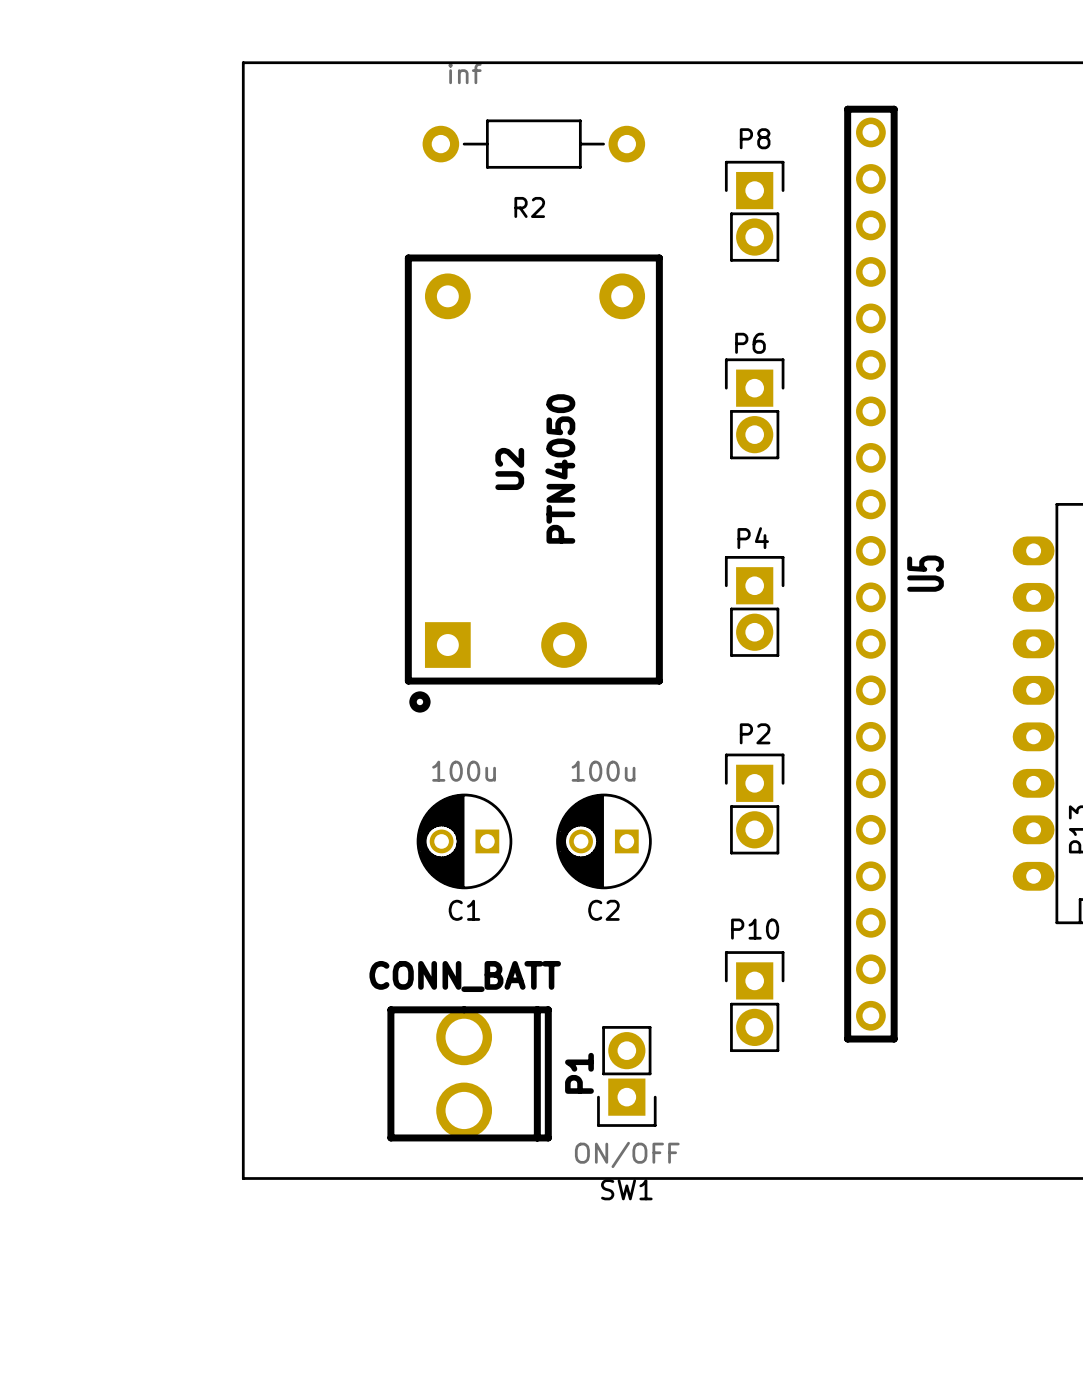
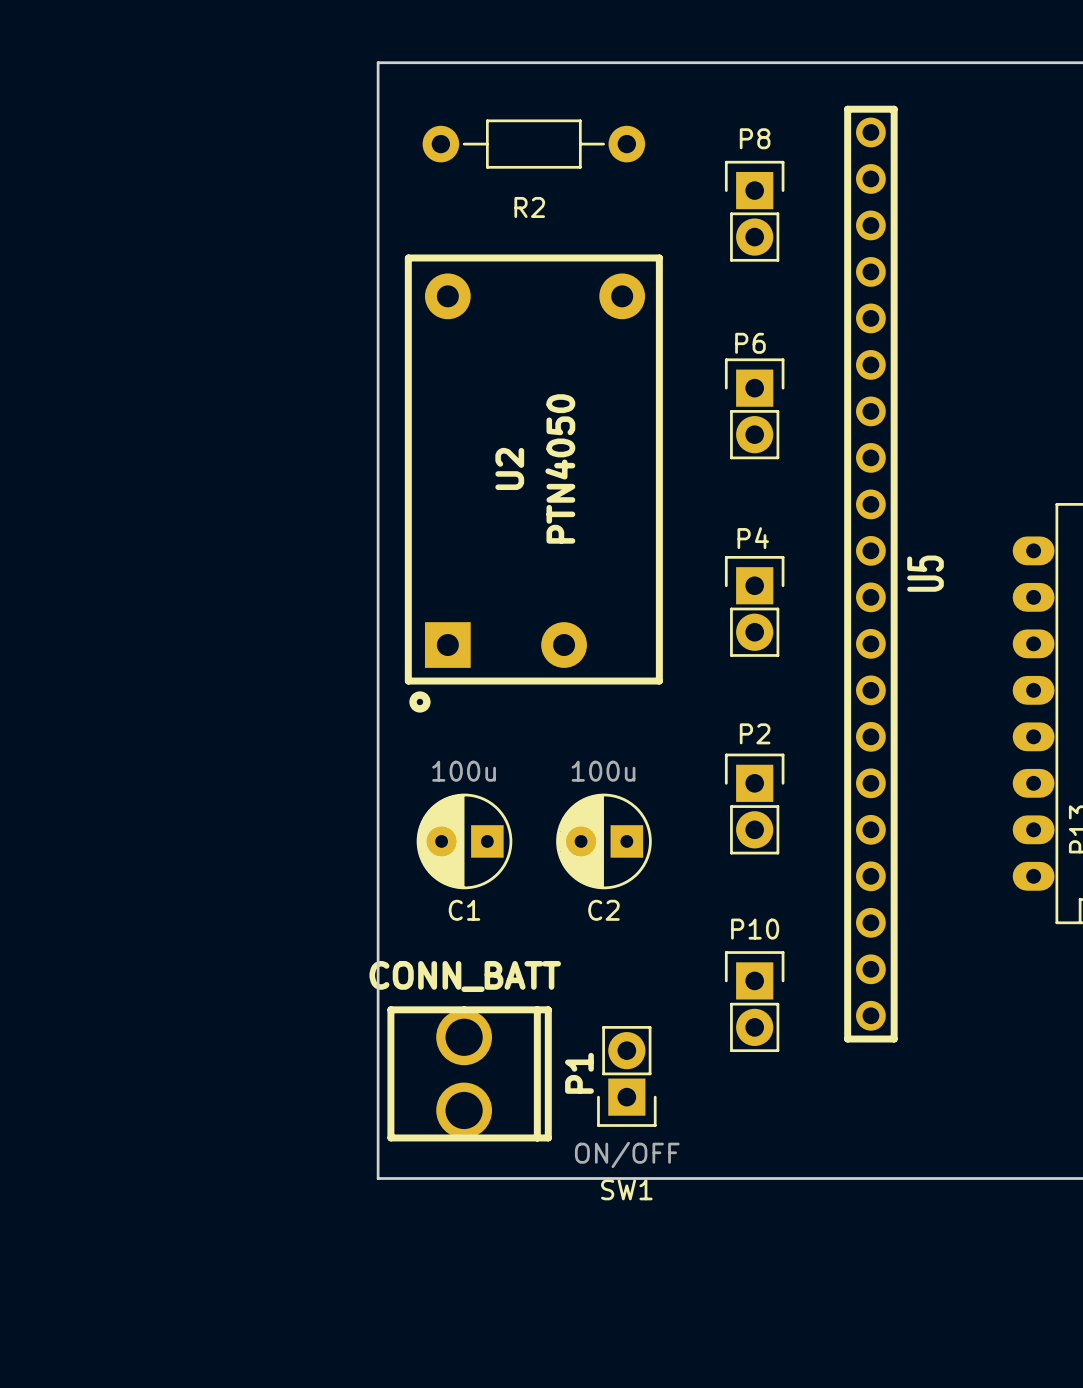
board edge: (378, 62) (243, 62) (243, 1178) (378, 1178) -> (378, 62) (378, 1178)
R2 value: inf (464, 73) -> none
C1 footprint: [416, 793, 513, 890] -> [416, 793, 513, 890]
C2 footprint: [556, 793, 652, 890] -> [556, 793, 652, 890]

